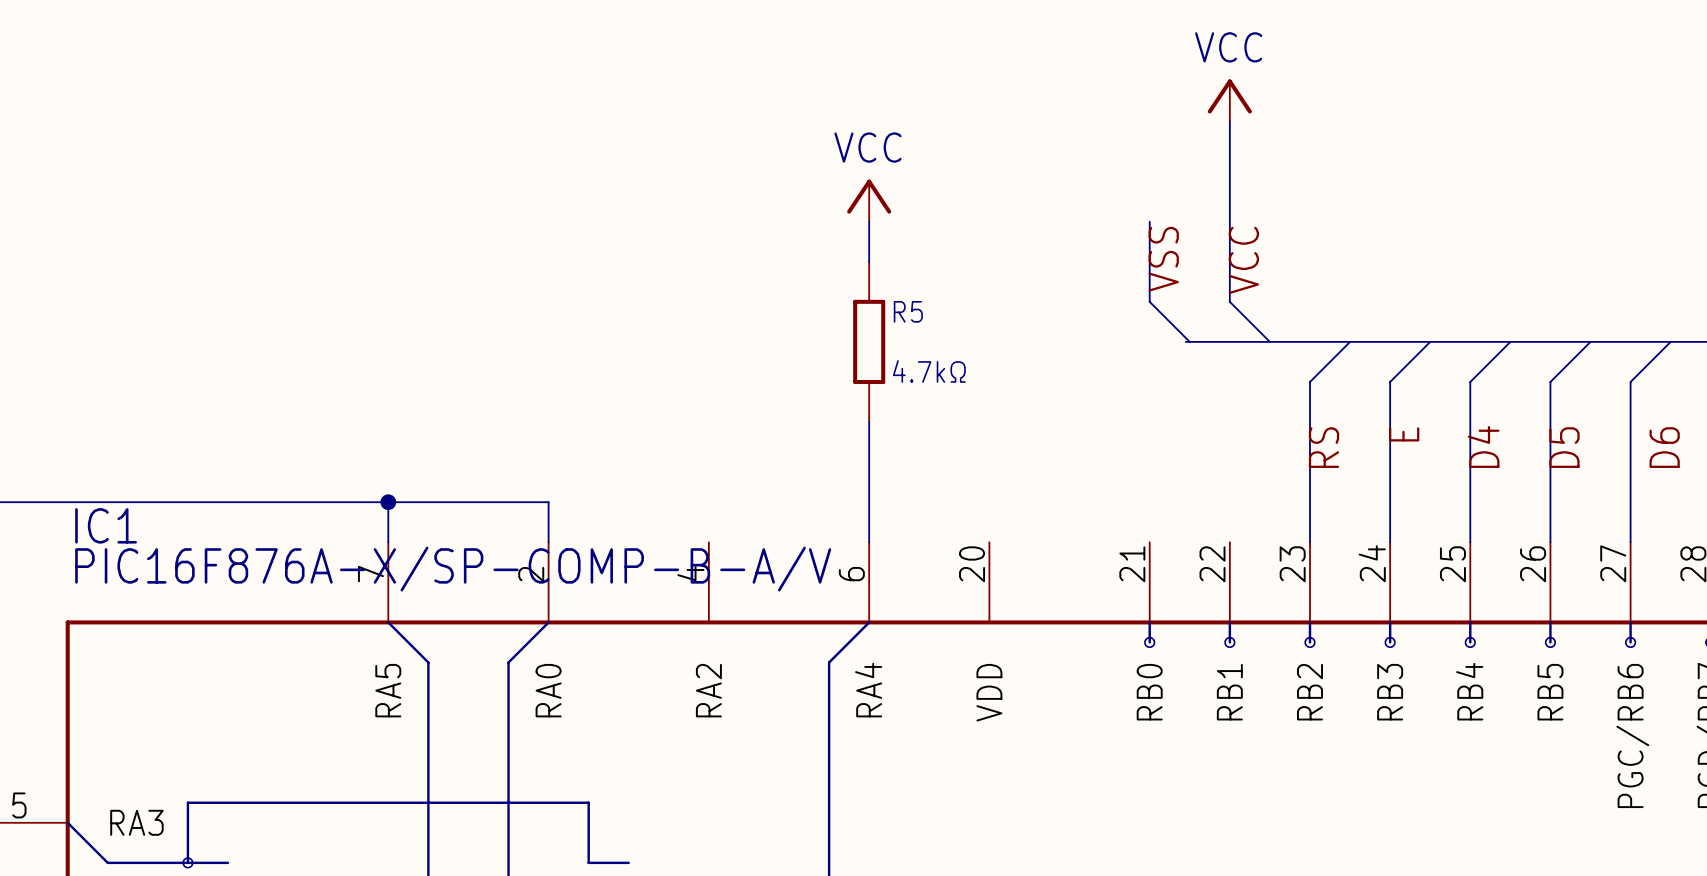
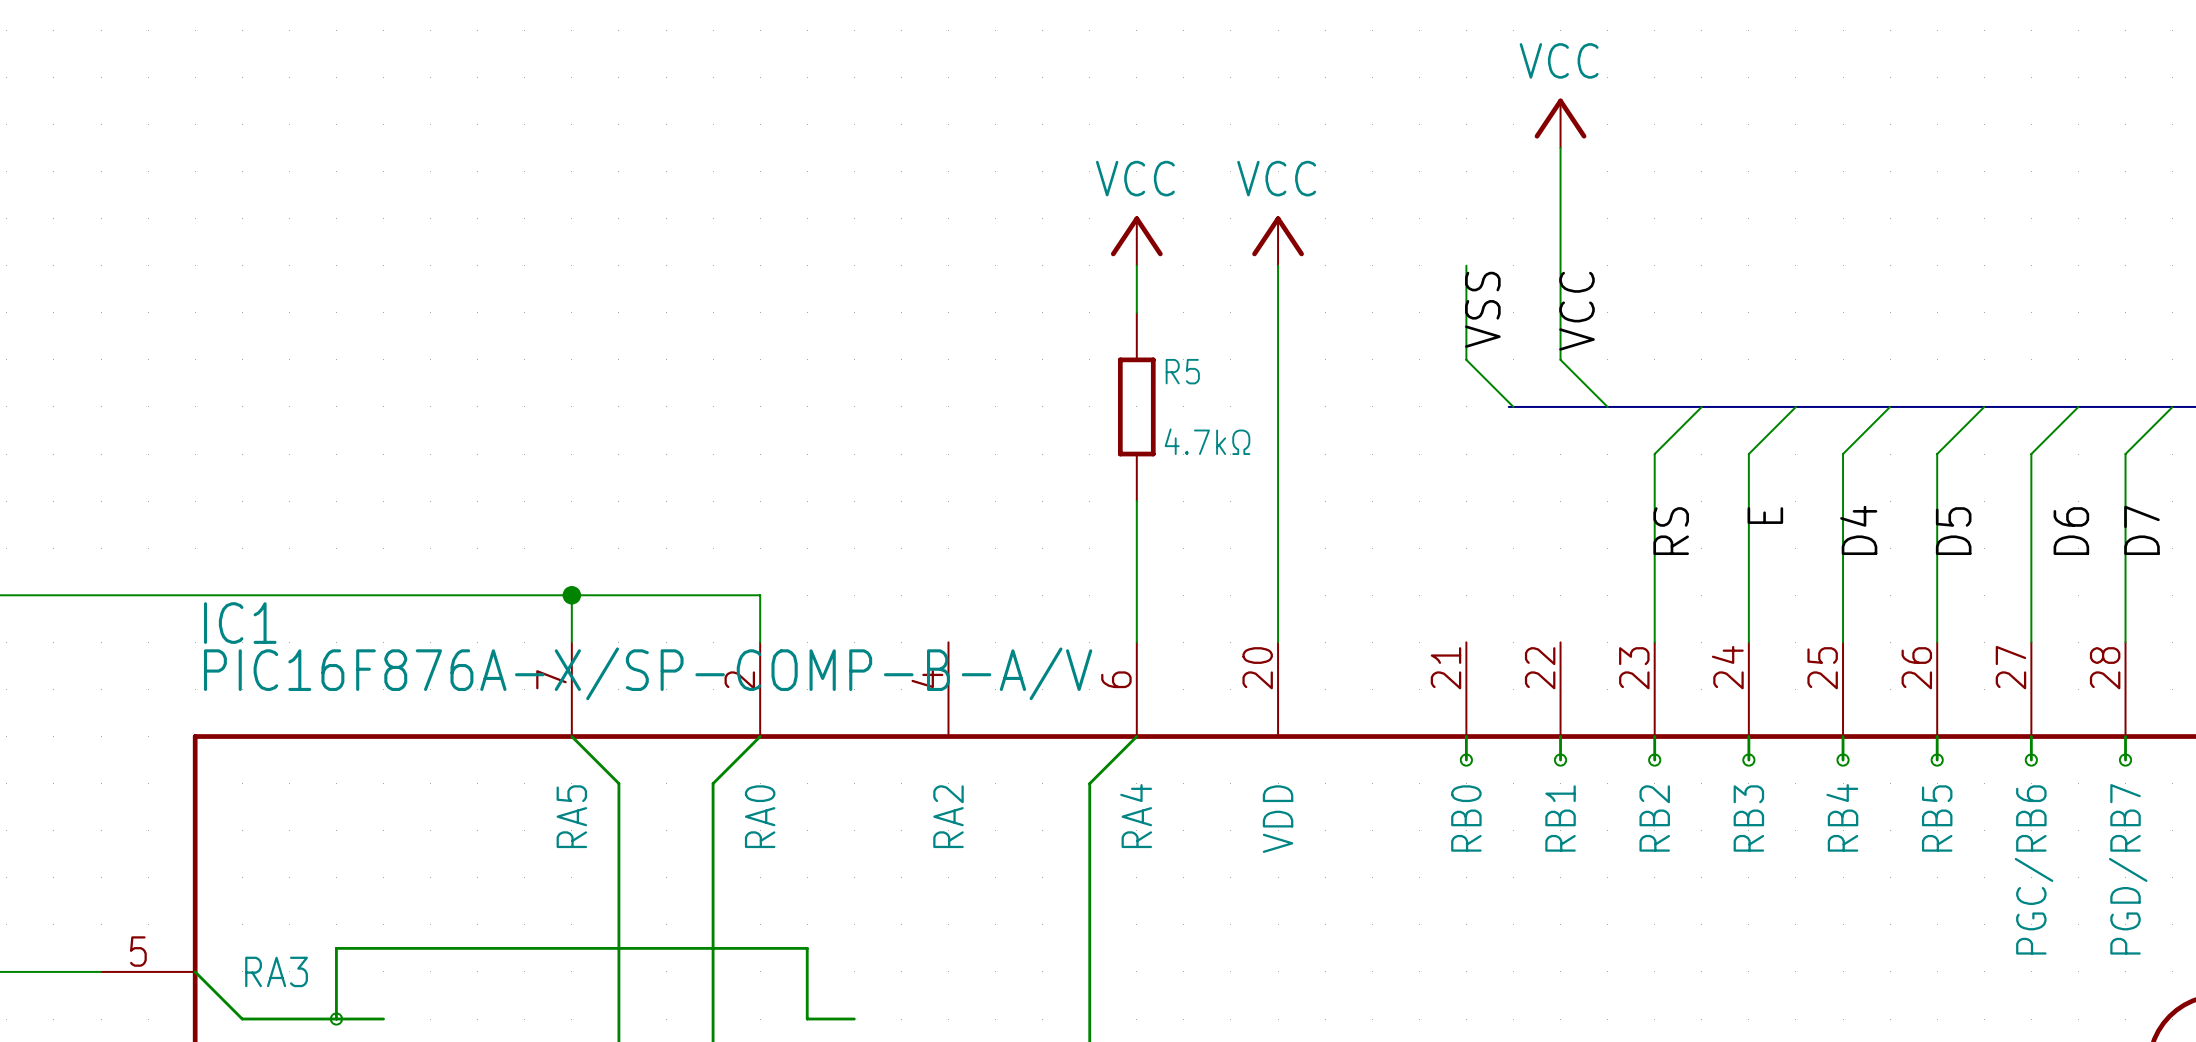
power symbol: none -> VCC (1278, 240)
wire: none -> (1278, 265) (1278, 642)

